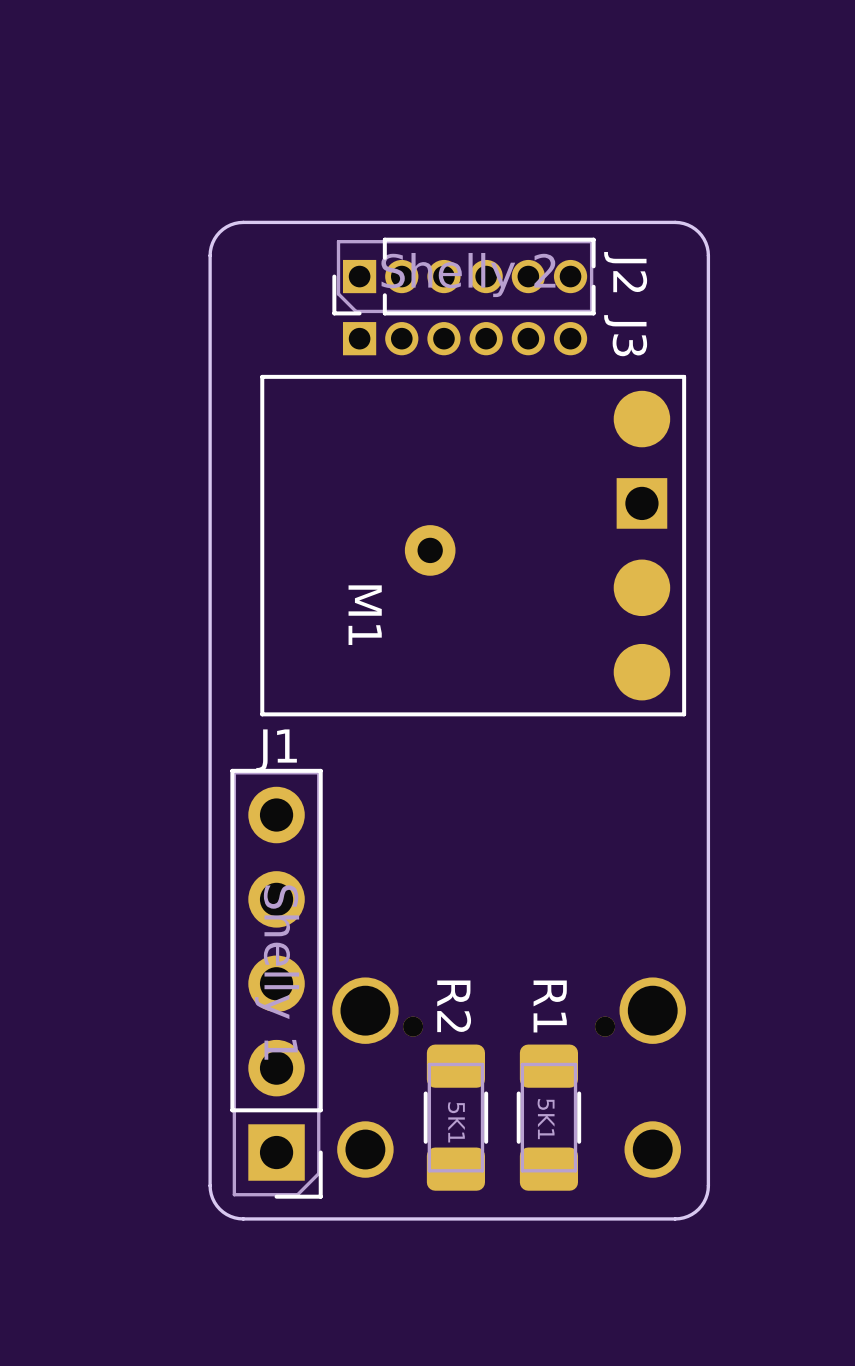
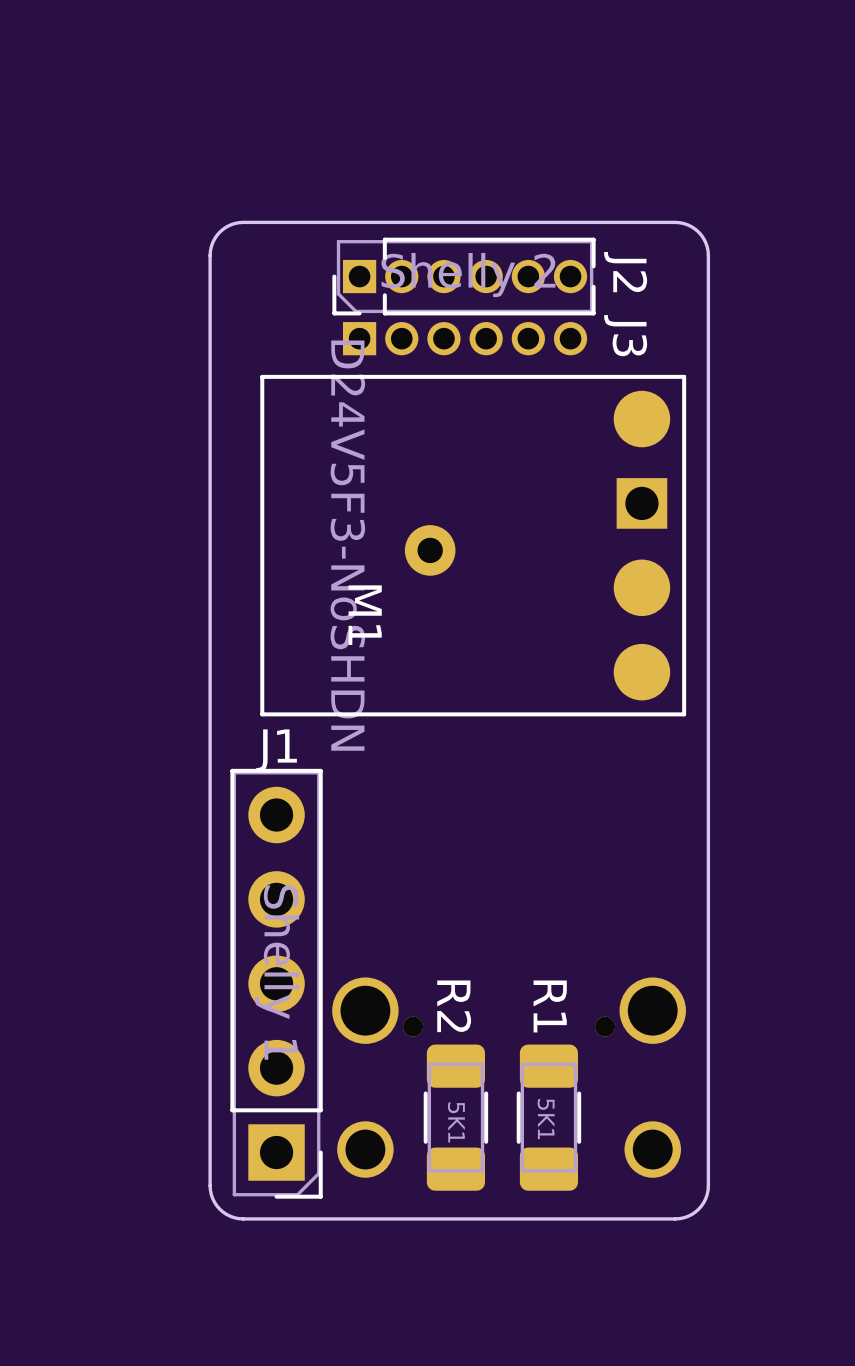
M1 value: none -> D24V5F3-NoSHDN (347, 545)

